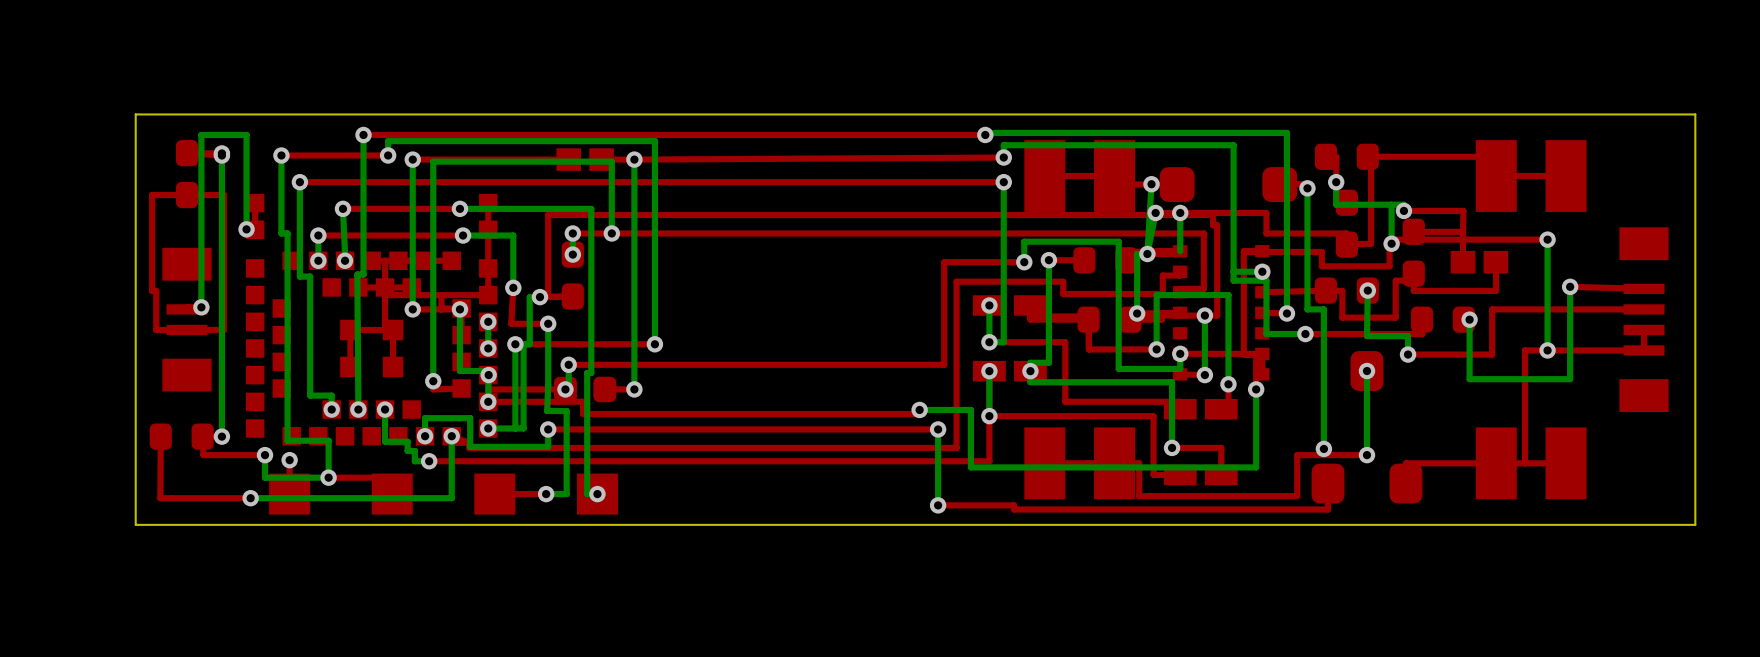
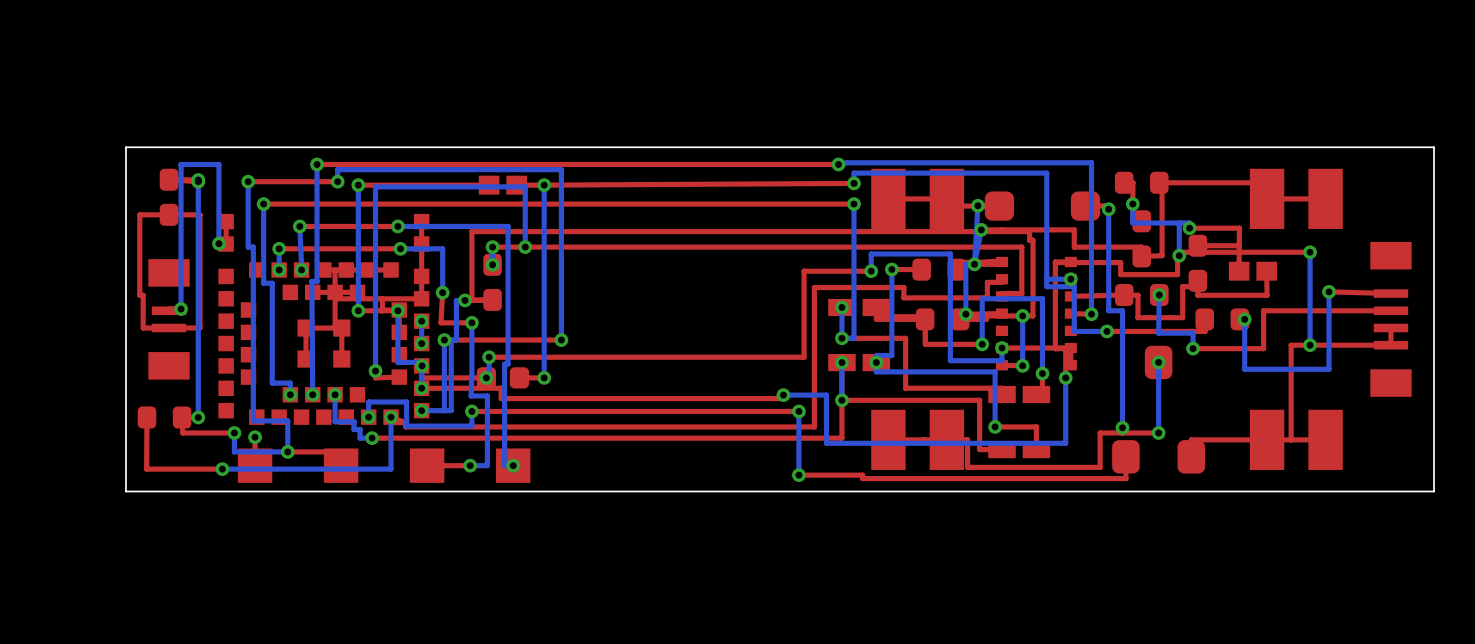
bottom track: (1180, 212) (1180, 251) -> none
via: (1180, 212) -> none

